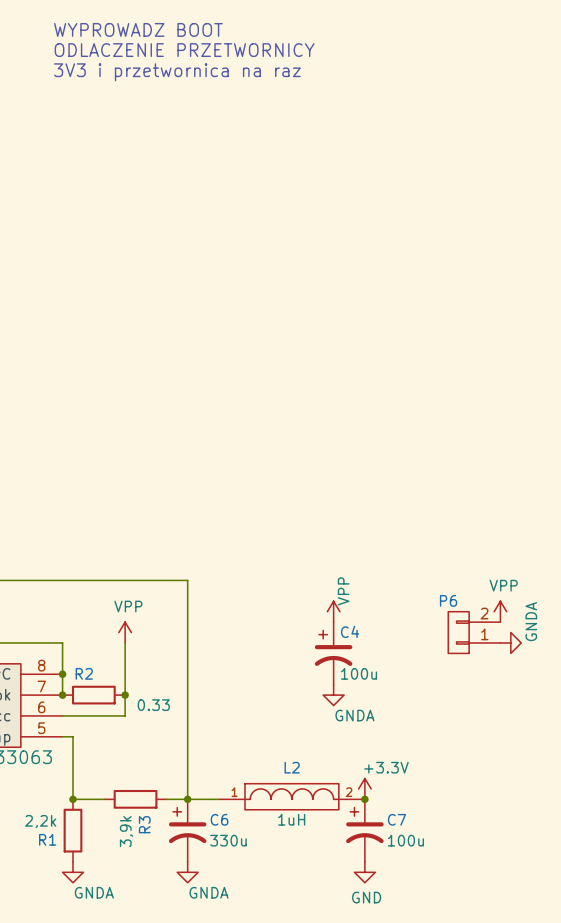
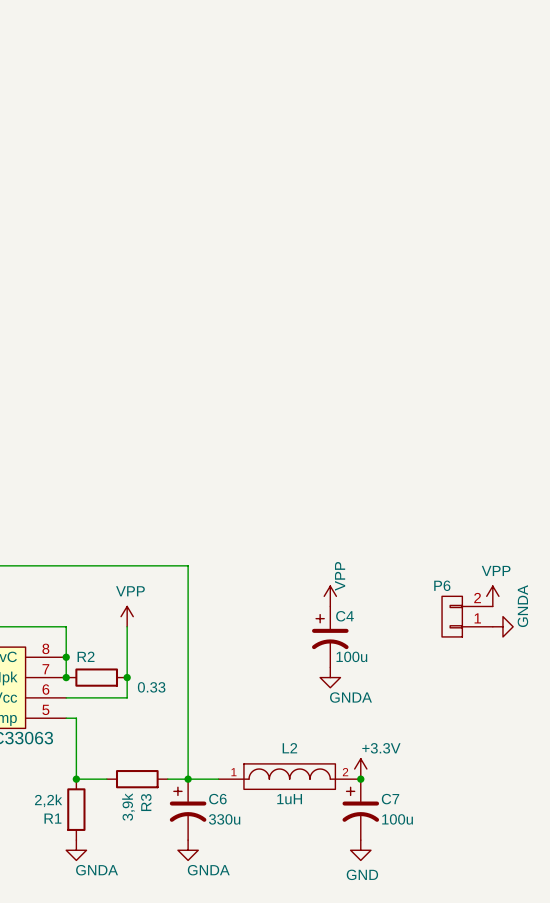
text: WYPROWADZ BOOT (138, 29) -> none
text: ODLACZENIE PRZETWORNICY (184, 50) -> none
text: 3V3 i przetwornica na raz (177, 72) -> none

